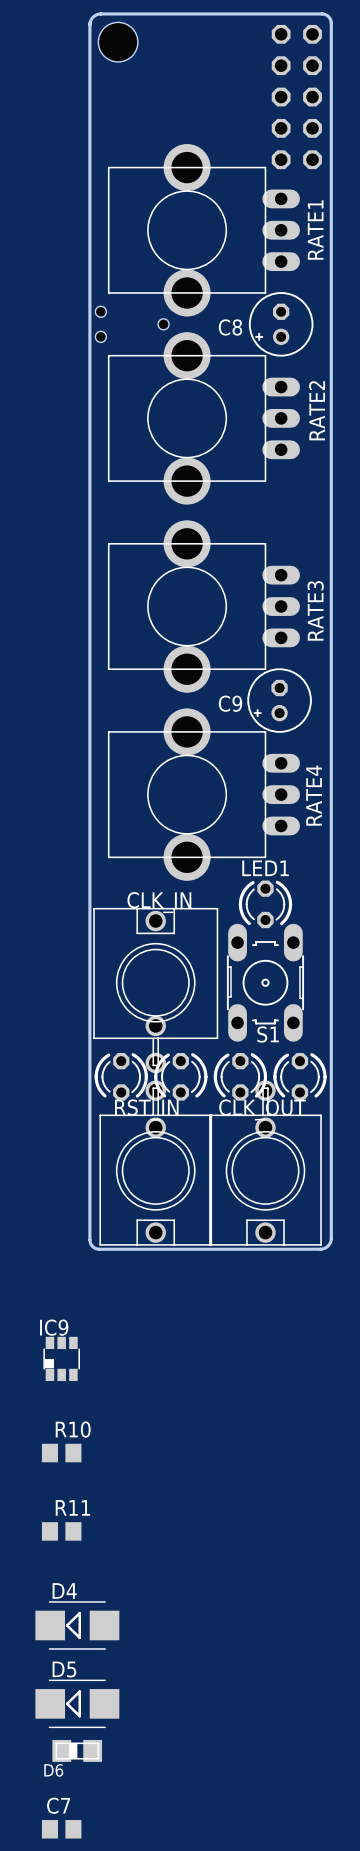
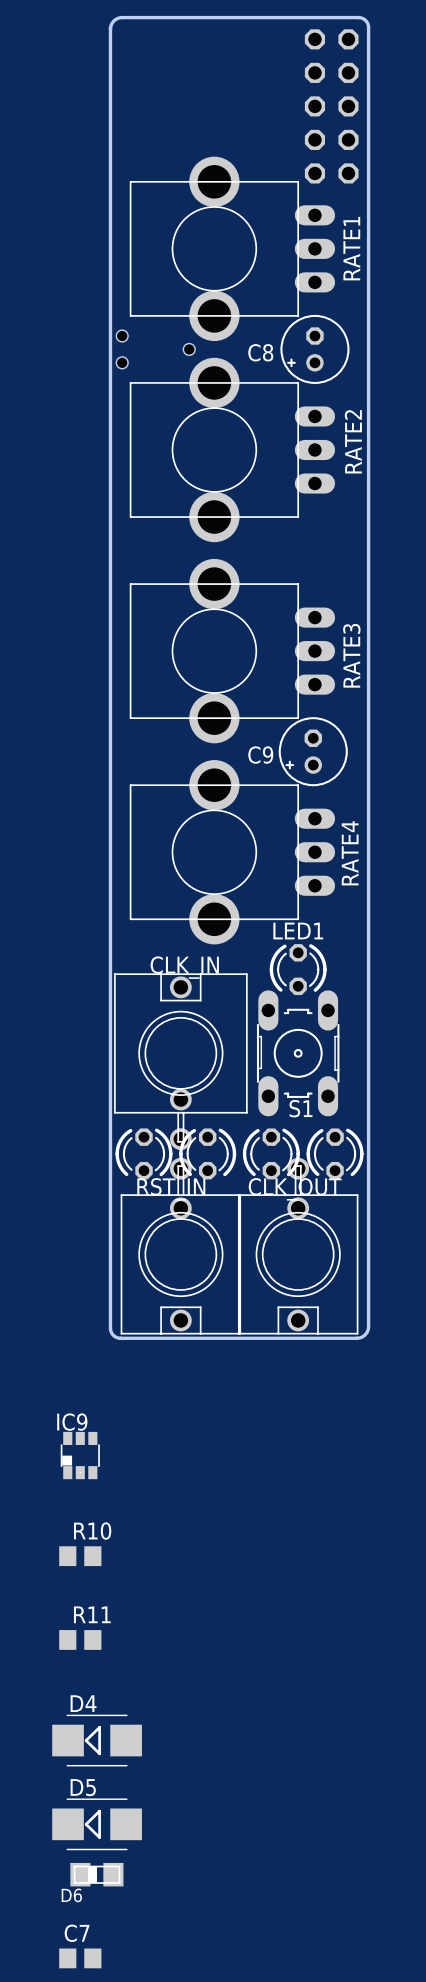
hole: (118, 42) -> none

